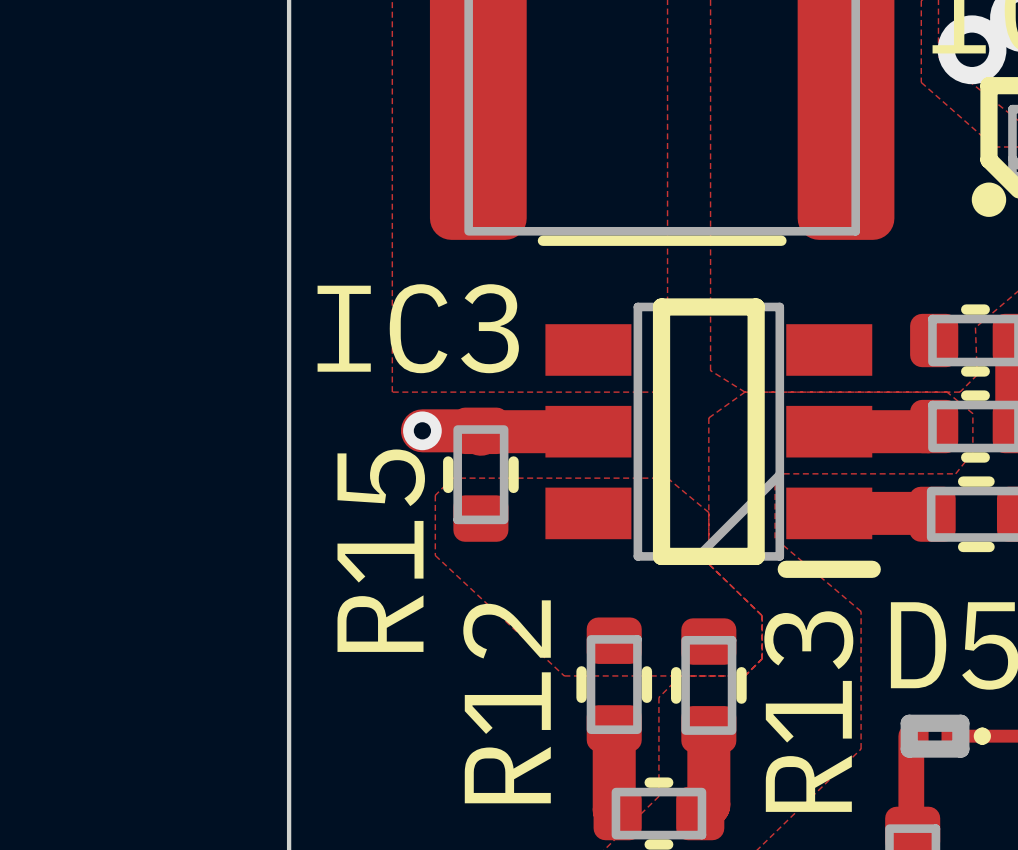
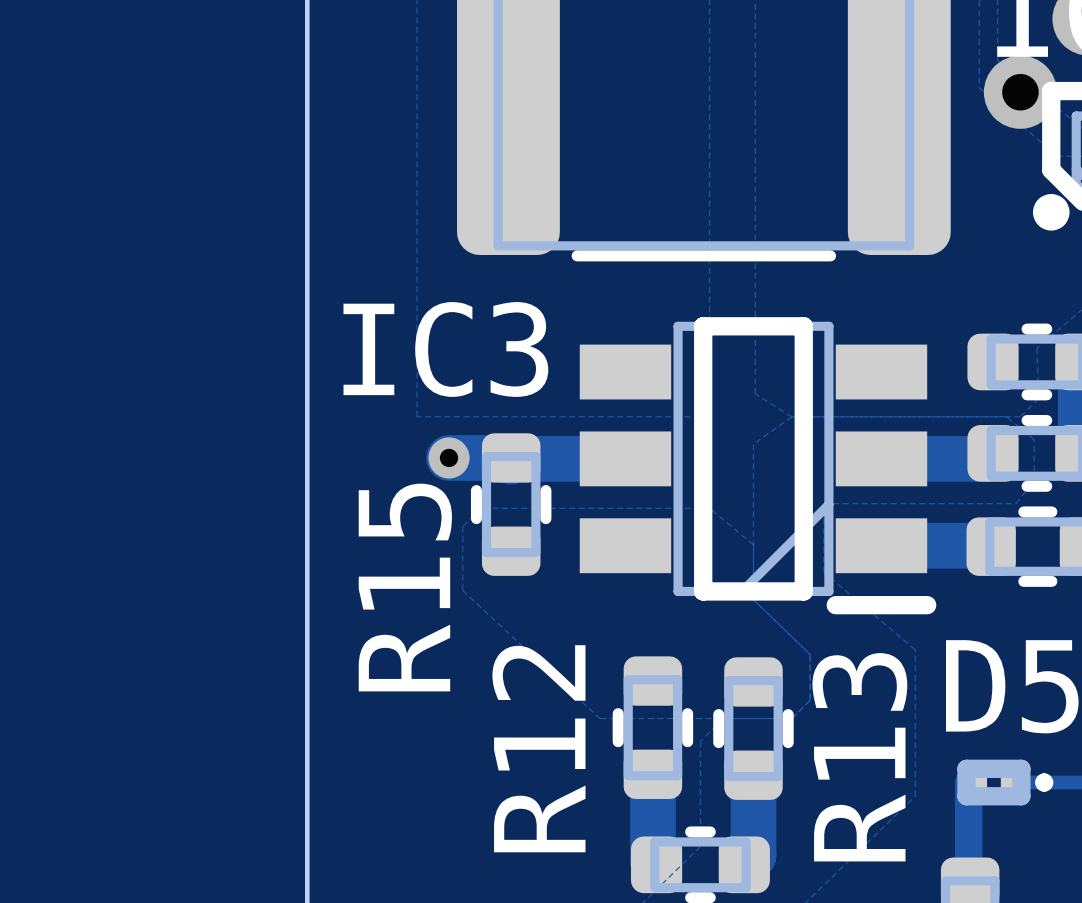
via position: (972, 49) -> (1020, 92)

